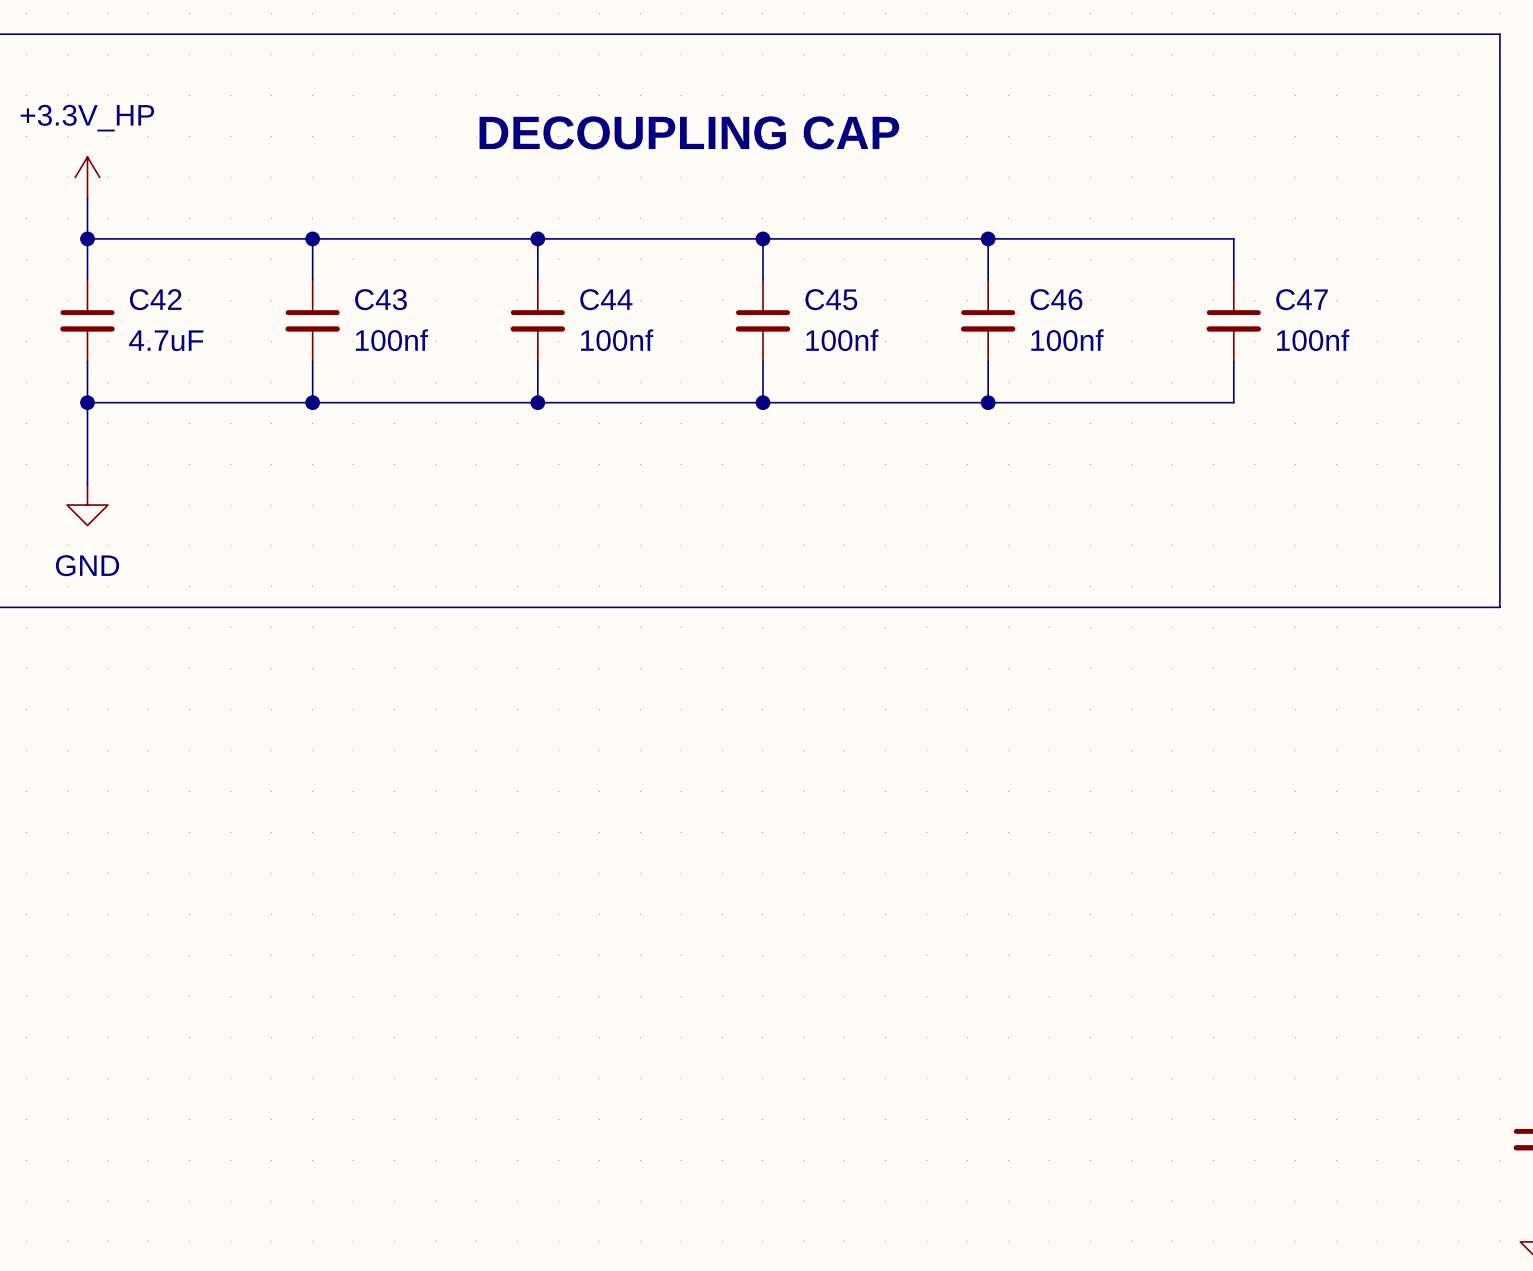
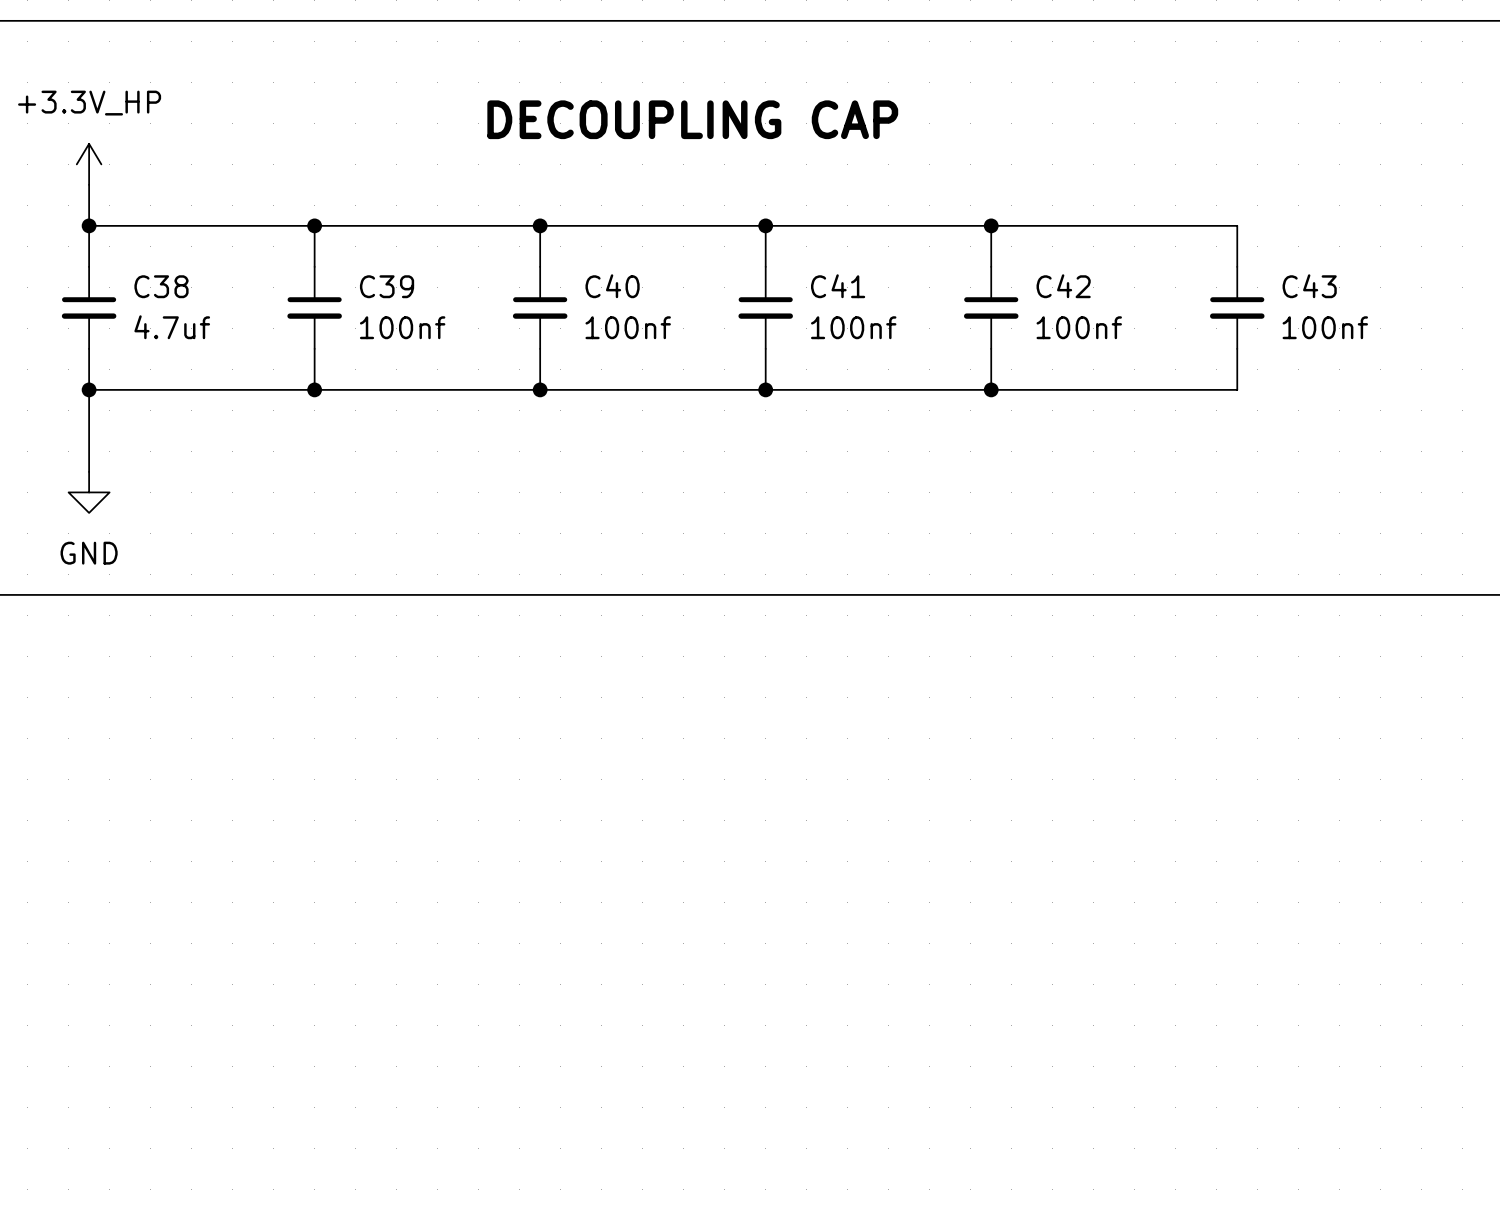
C42 name: C42 (155, 299) -> C38 (161, 286)
C43 name: C43 (380, 299) -> C39 (387, 286)
C44 name: C44 (606, 299) -> C40 (612, 286)
C45 name: C45 (831, 299) -> C41 (838, 286)
C46 name: C46 (1056, 299) -> C42 (1063, 286)
C47 name: C47 (1302, 299) -> C43 (1309, 286)
C42 value: 4.7uF (166, 340) -> 4.7uf (172, 327)

